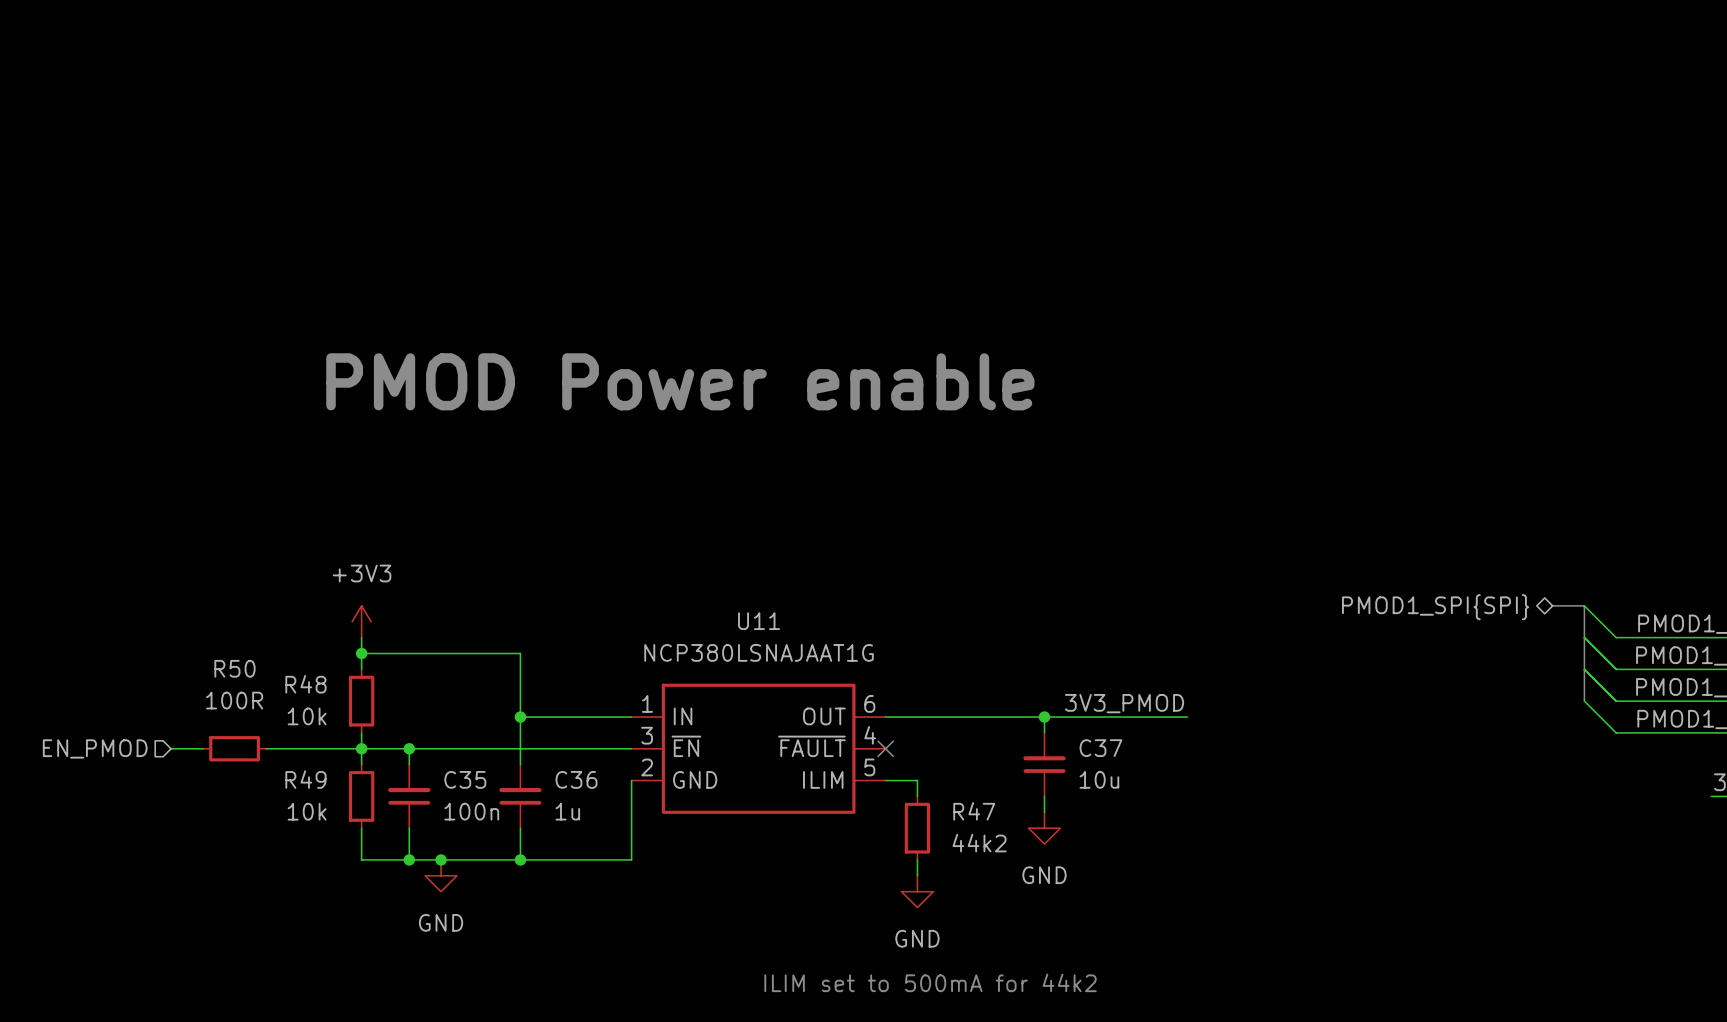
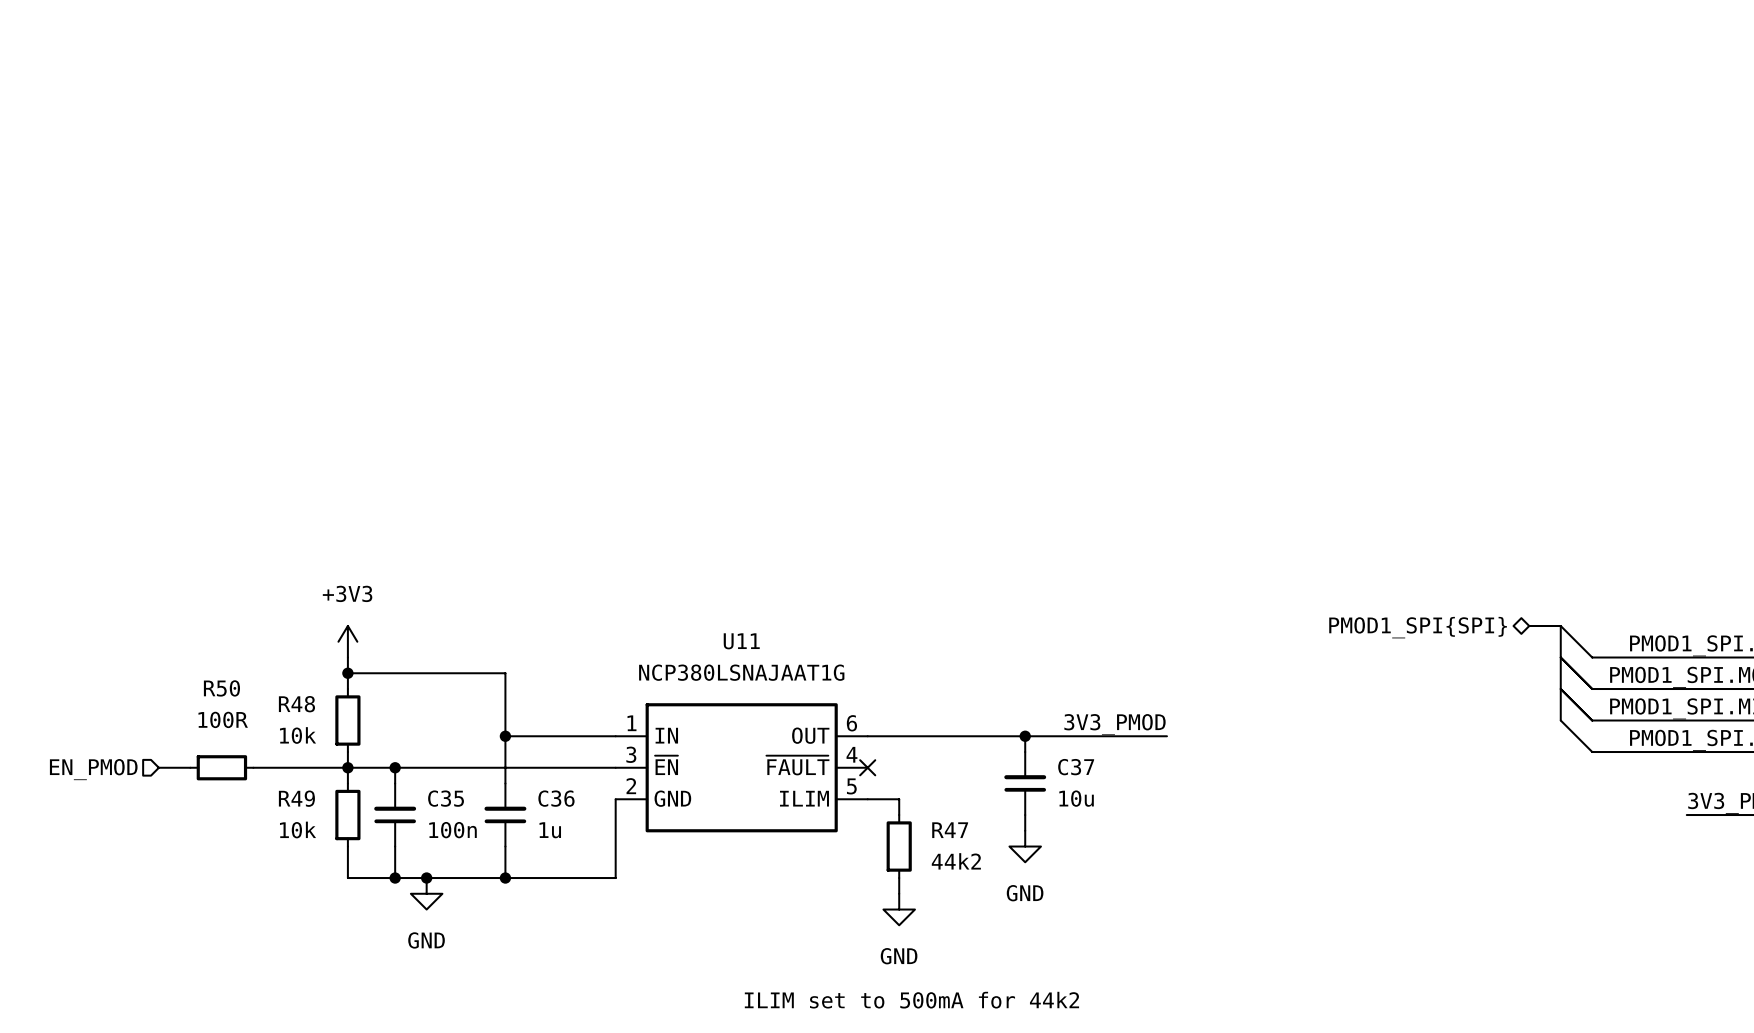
text: PMOD Power enable (680, 381) -> none

